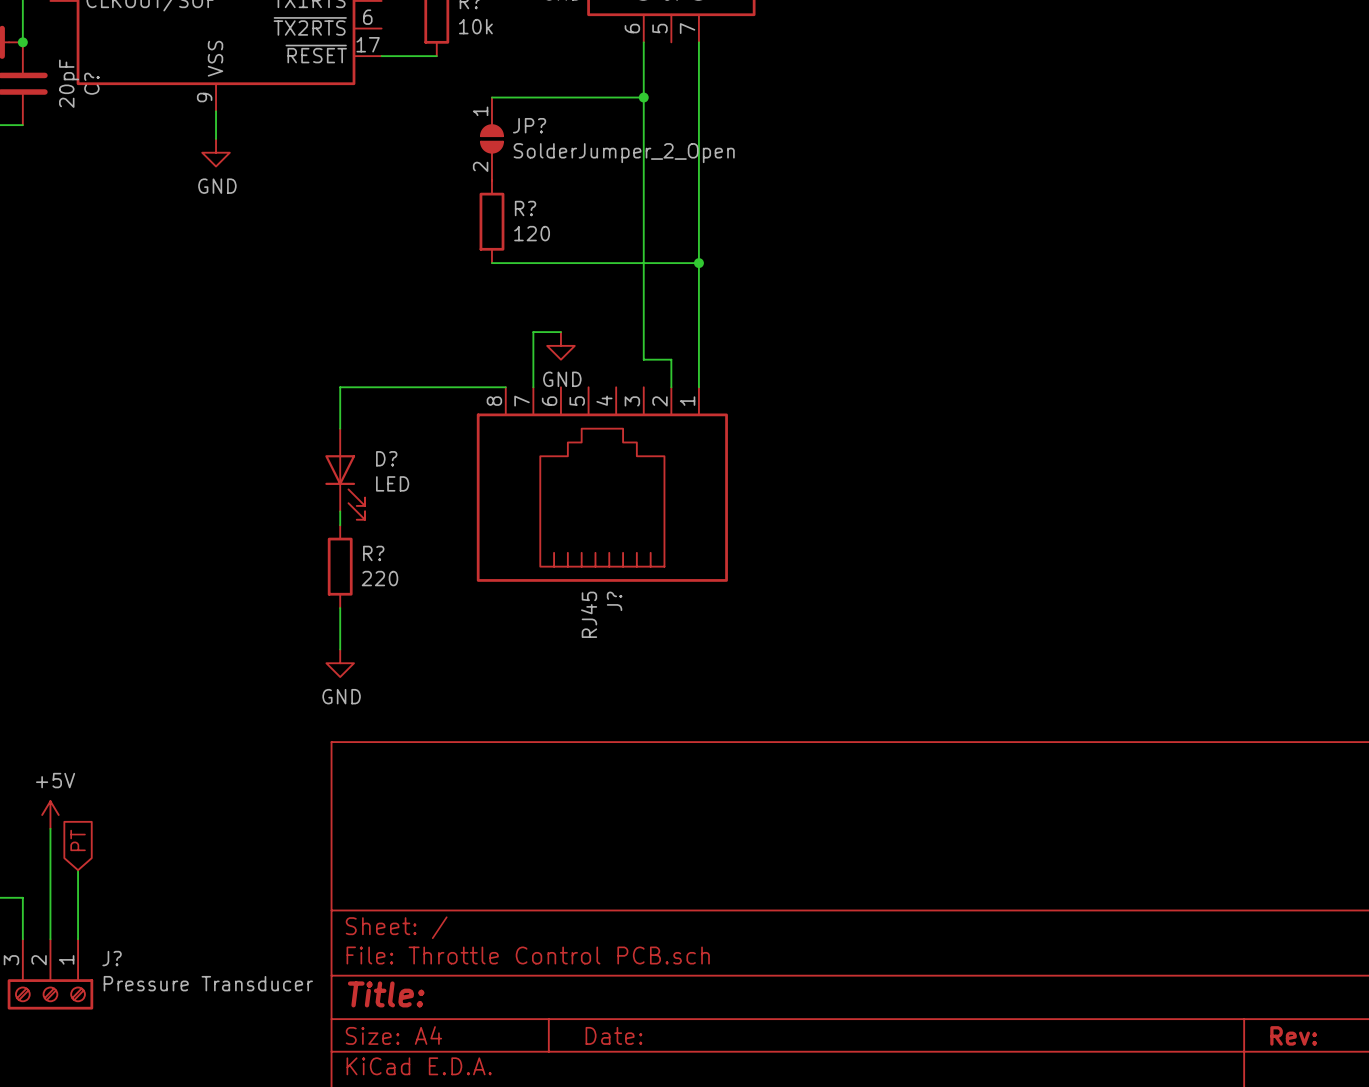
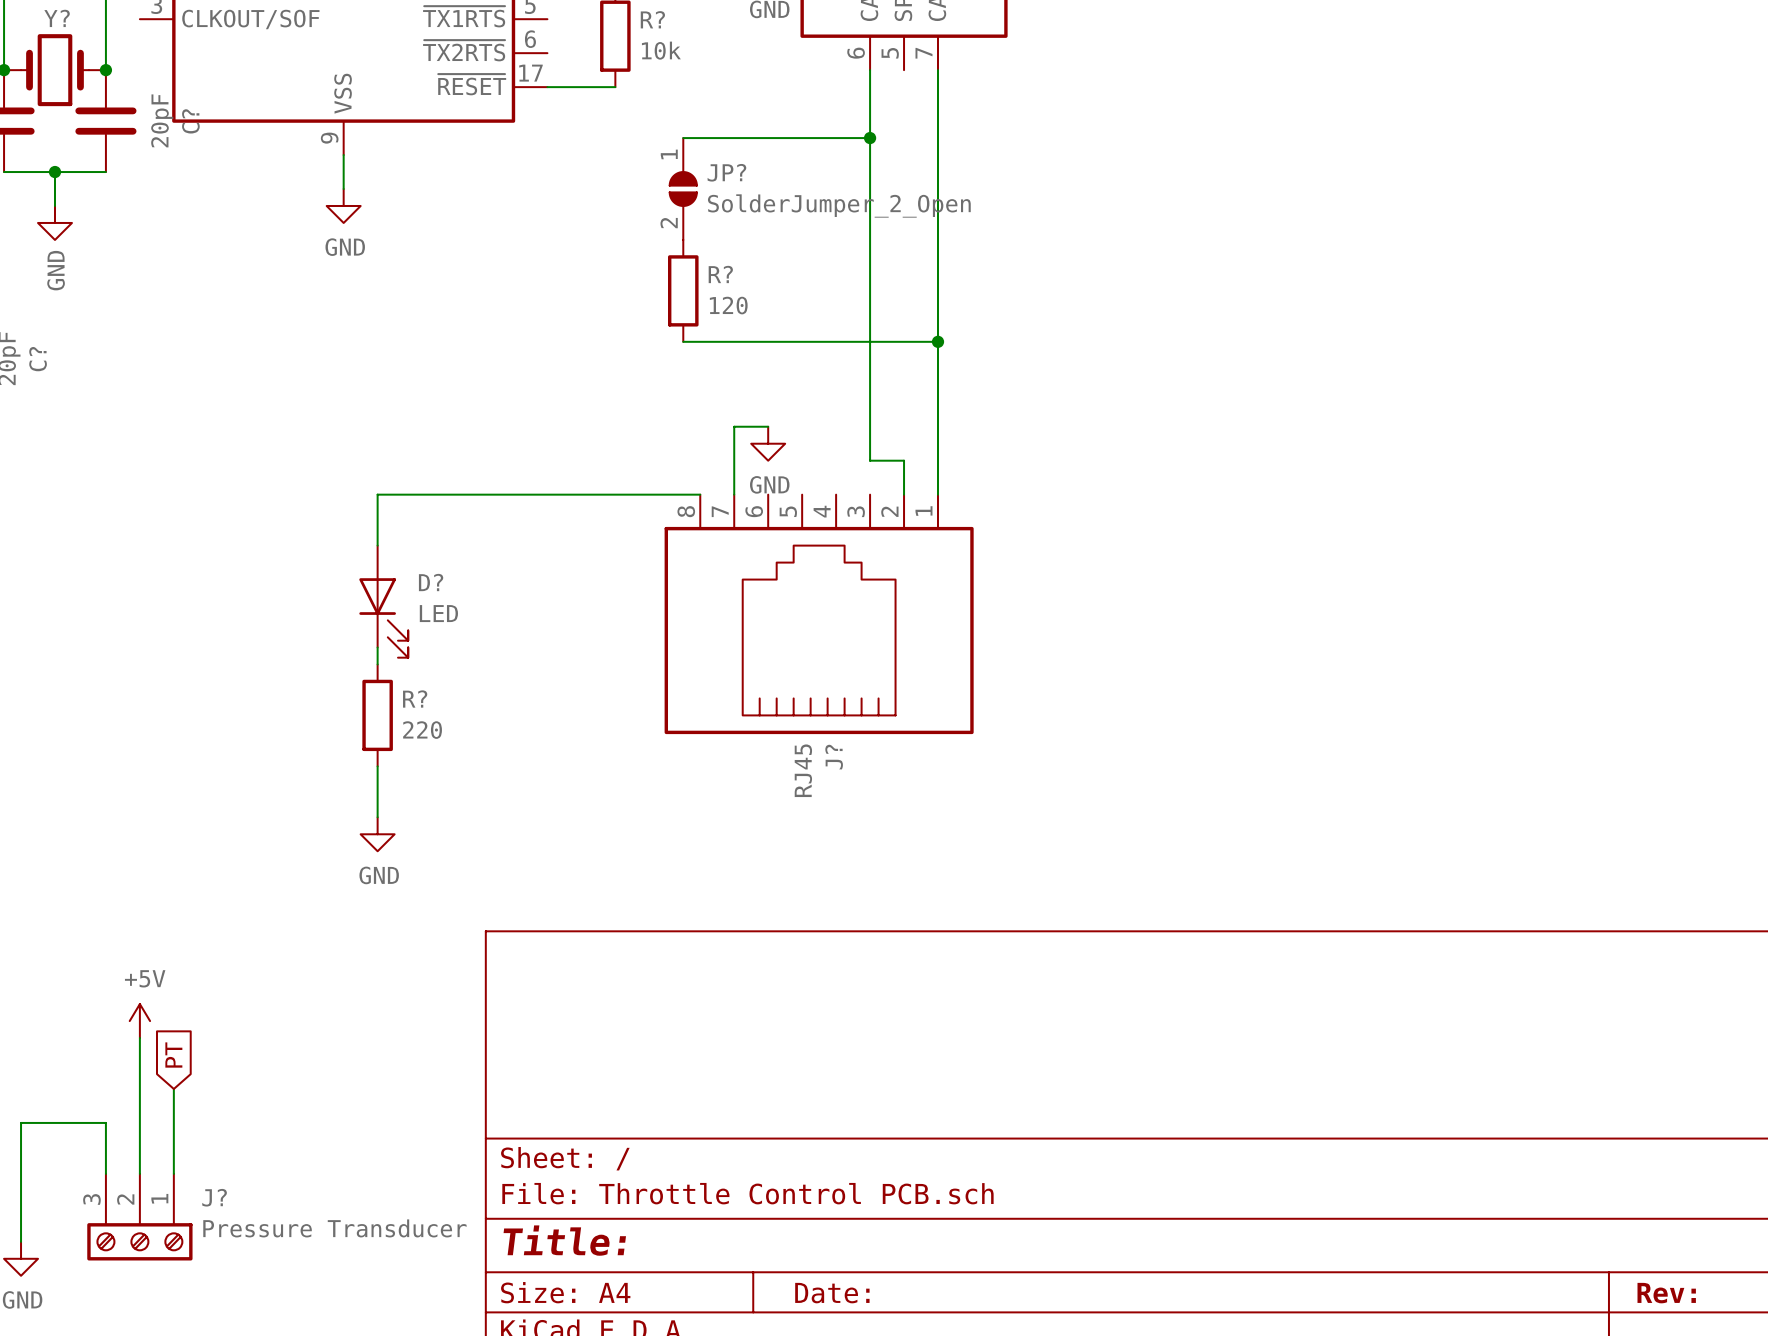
wire: (340, 387) (340, 428) -> (496, 494) (377, 494) (377, 545)
D? position: (345, 474) -> (383, 601)
wire: (340, 511) (340, 525) -> (377, 647) (377, 664)
R? position: (340, 566) -> (377, 715)
wire: (340, 608) (340, 649) -> (377, 766) (377, 817)
power symbol position: GND (340, 663) -> GND (377, 834)

